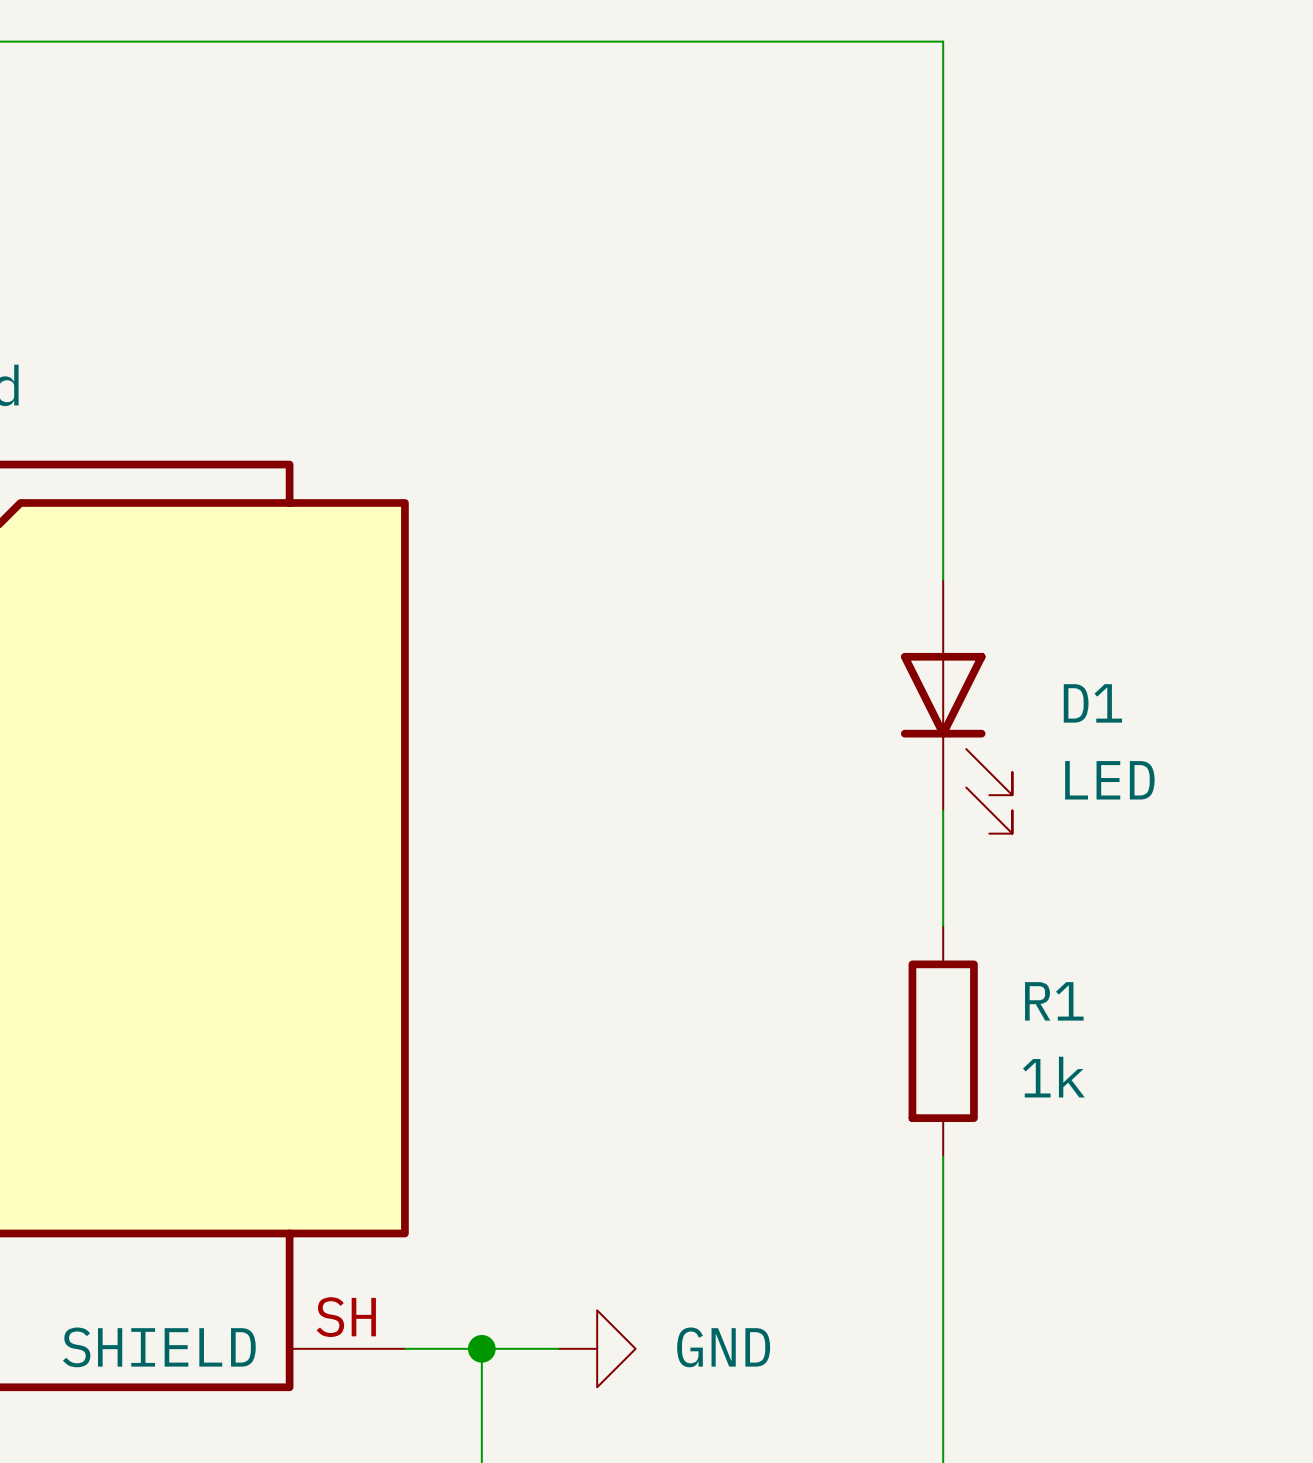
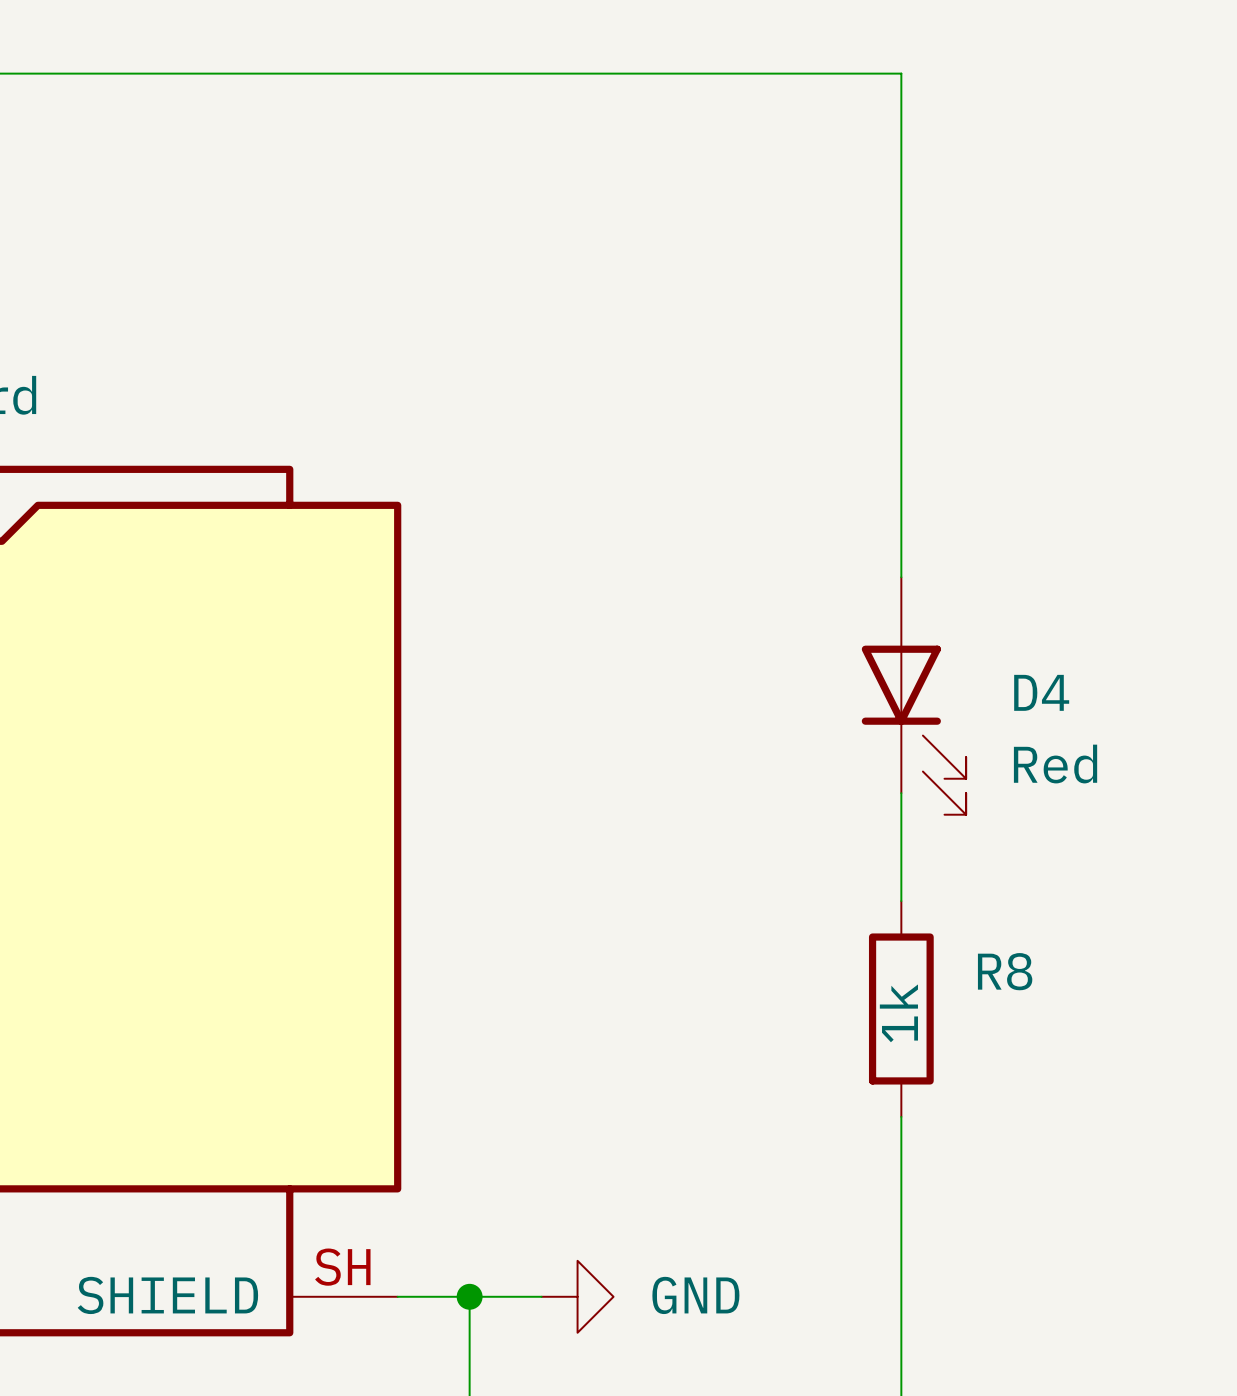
D1 name: D1 (1092, 703) -> D4 (1041, 692)
D1 value: LED (1109, 780) -> Red (1055, 764)
R1 name: R1 (1054, 1001) -> R8 (1005, 971)
R1 value rotation: 0° (1053, 1077) -> 90° counterclockwise (898, 1013)
R1 value position: 1k (1053, 1077) -> 1k (898, 1013)

